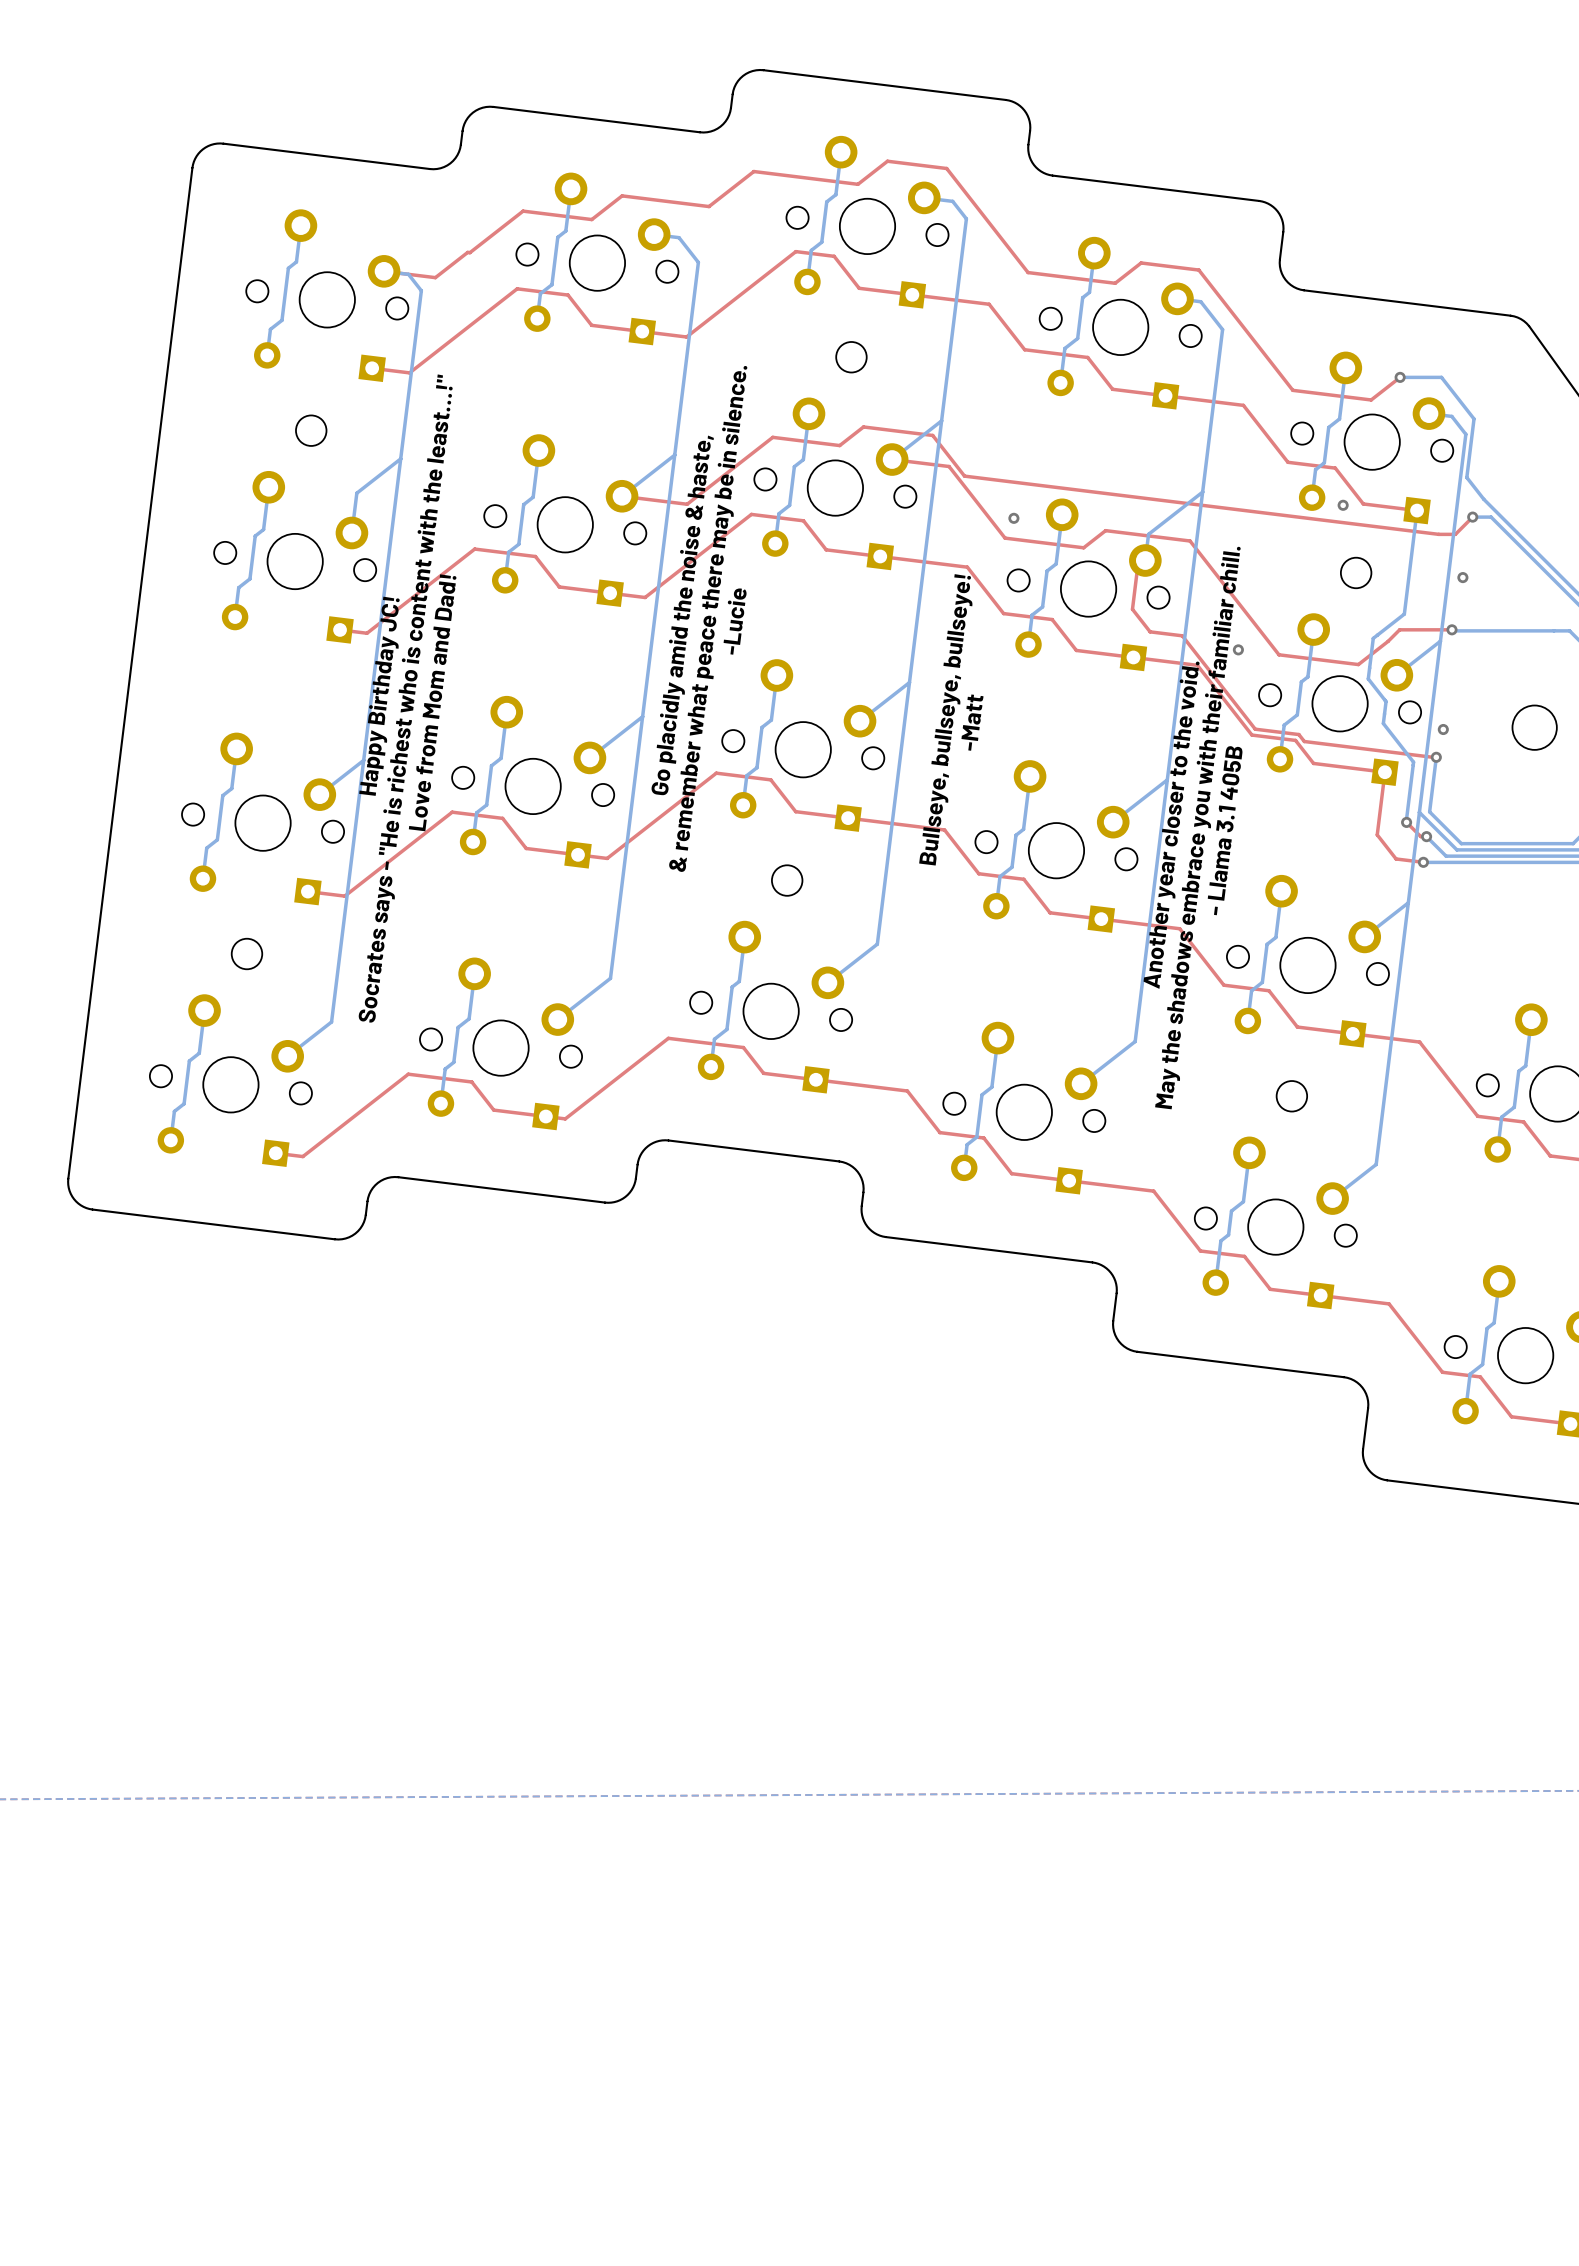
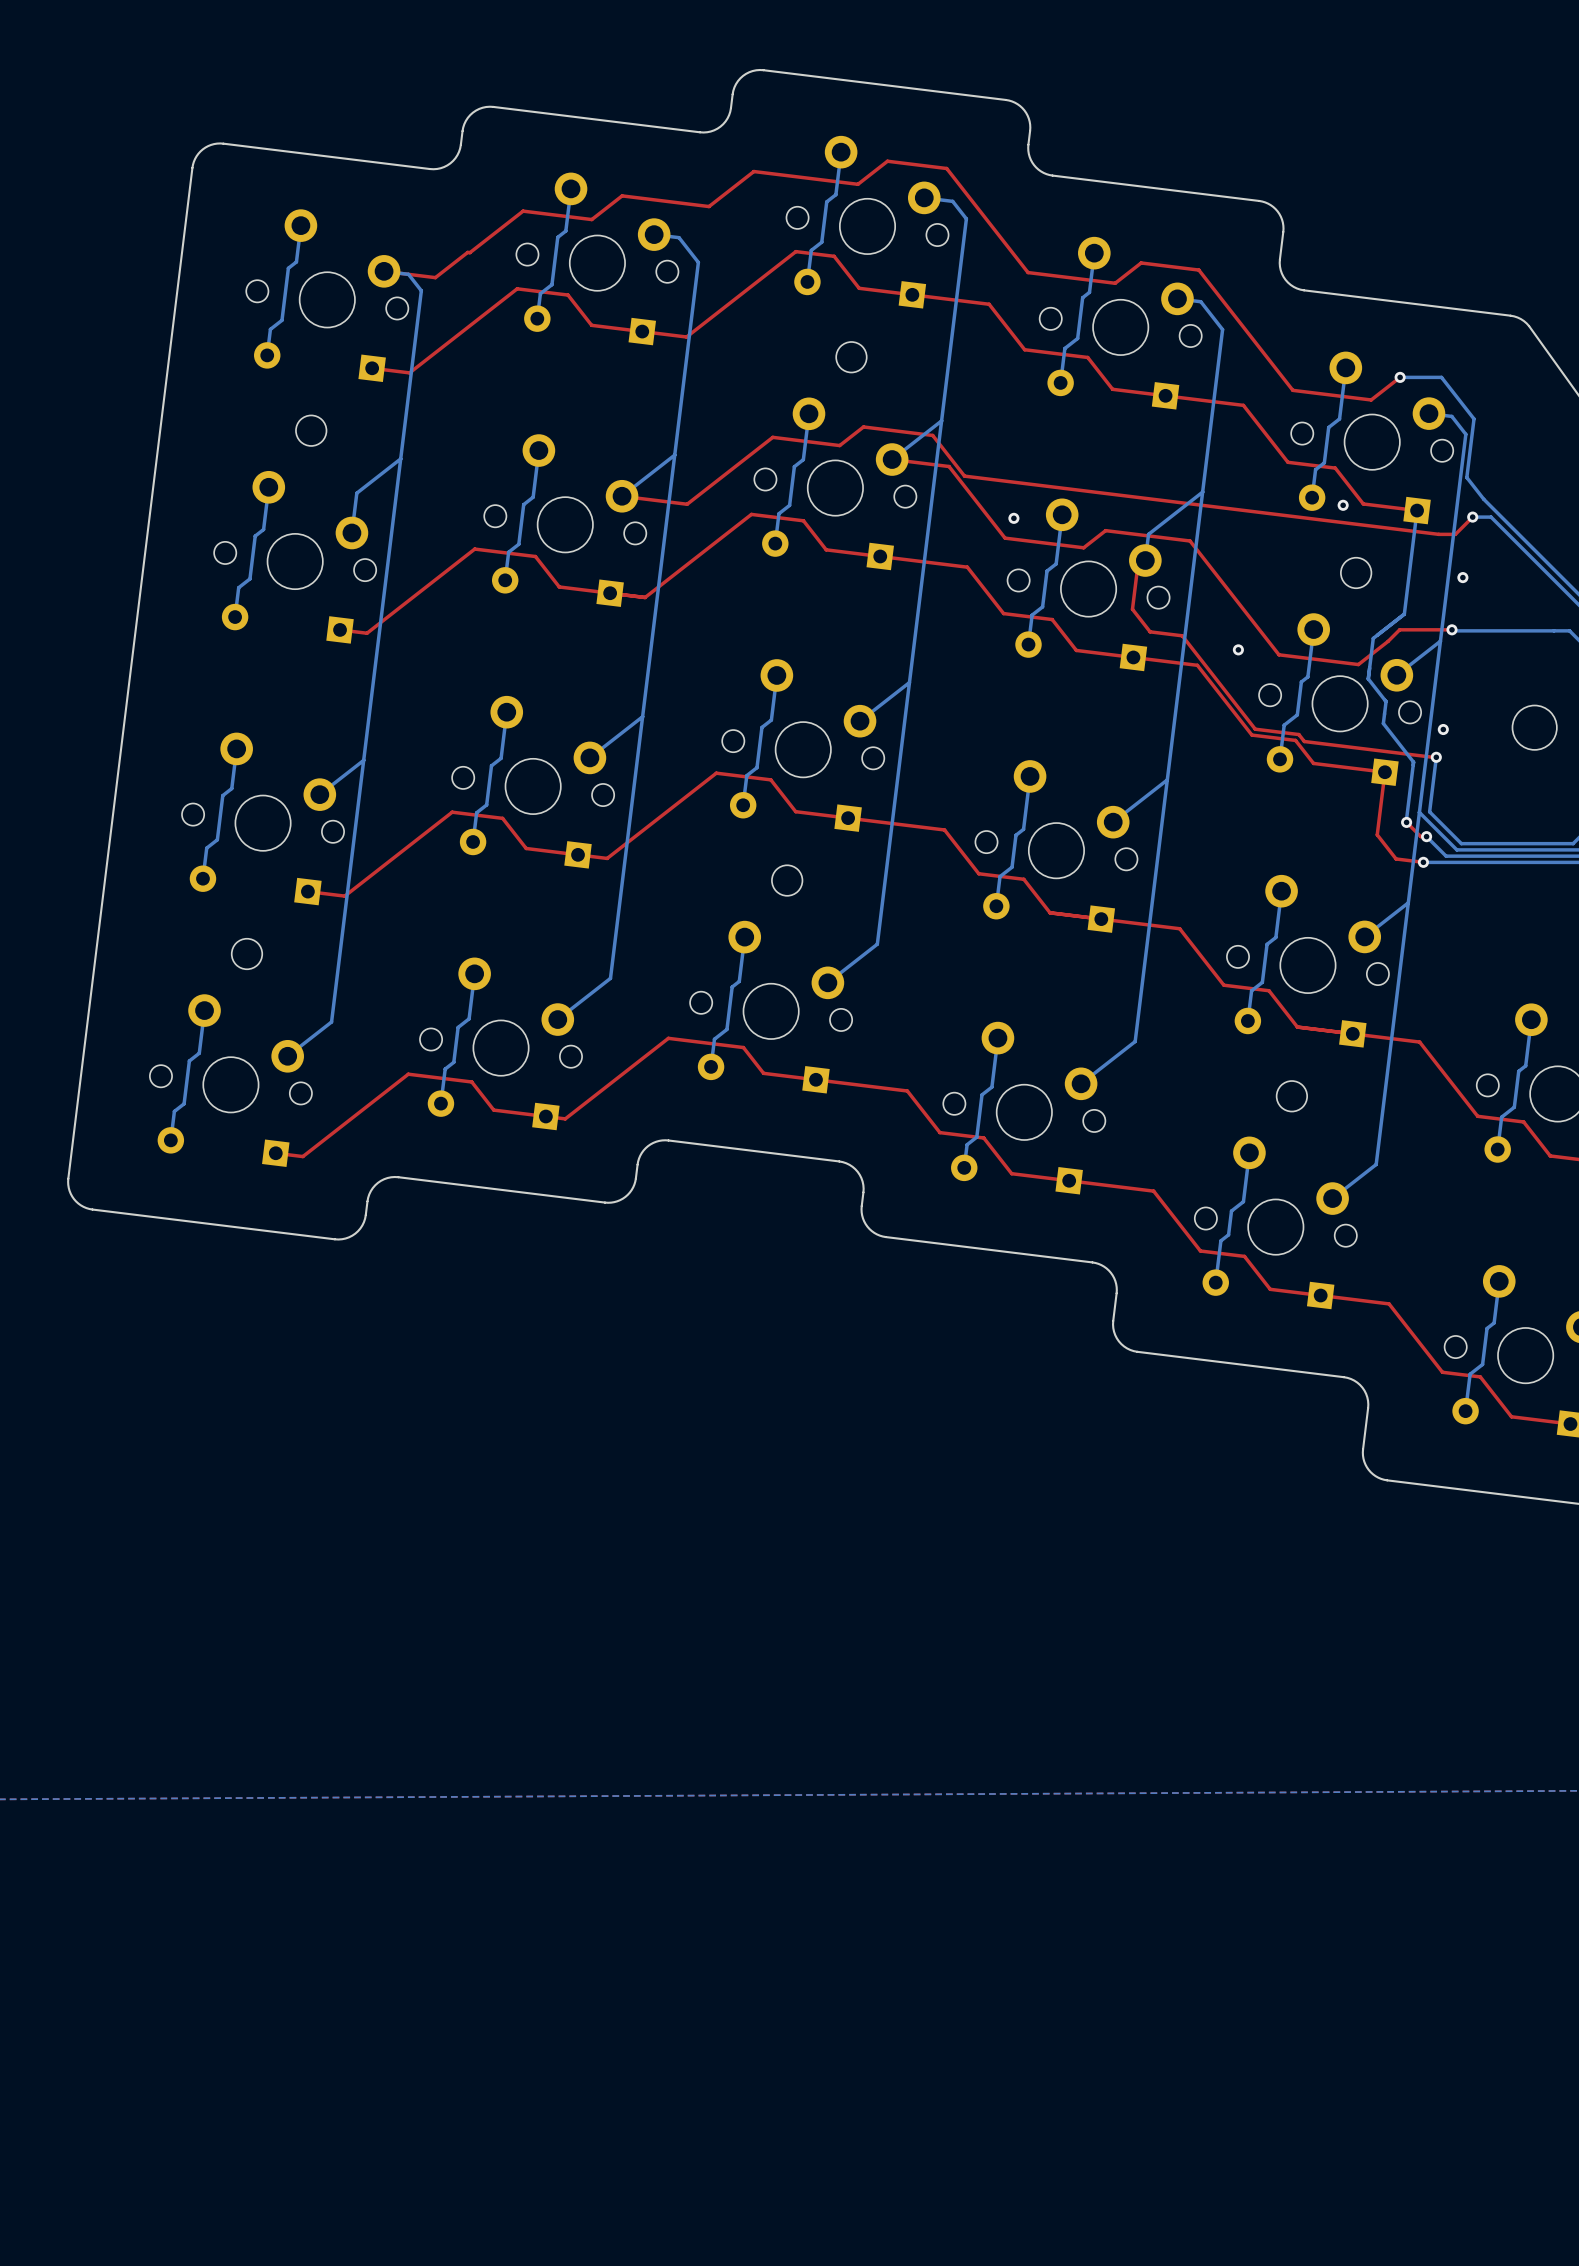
text: Go placidly amid the noise & haste, (682, 615) -> none
text: & remember what peace there may be in silence. (708, 619) -> none
text: -Lucie (735, 621) -> none
text: Happy Birthday JC! (379, 696) -> none
text: Socrates says - "He is richest who is content with the least…!" (405, 698) -> none
text: Love from Mom and Dad! (432, 702) -> none
text: Bullseye, bullseye, bullseye! (945, 719) -> none
text: -Matt (972, 722) -> none
text: Another year closer to the void. (1171, 825) -> none
text: May the shadows embrace you with their familiar chill. (1197, 828) -> none
text: - Llama 3.1 405B (1225, 830) -> none

